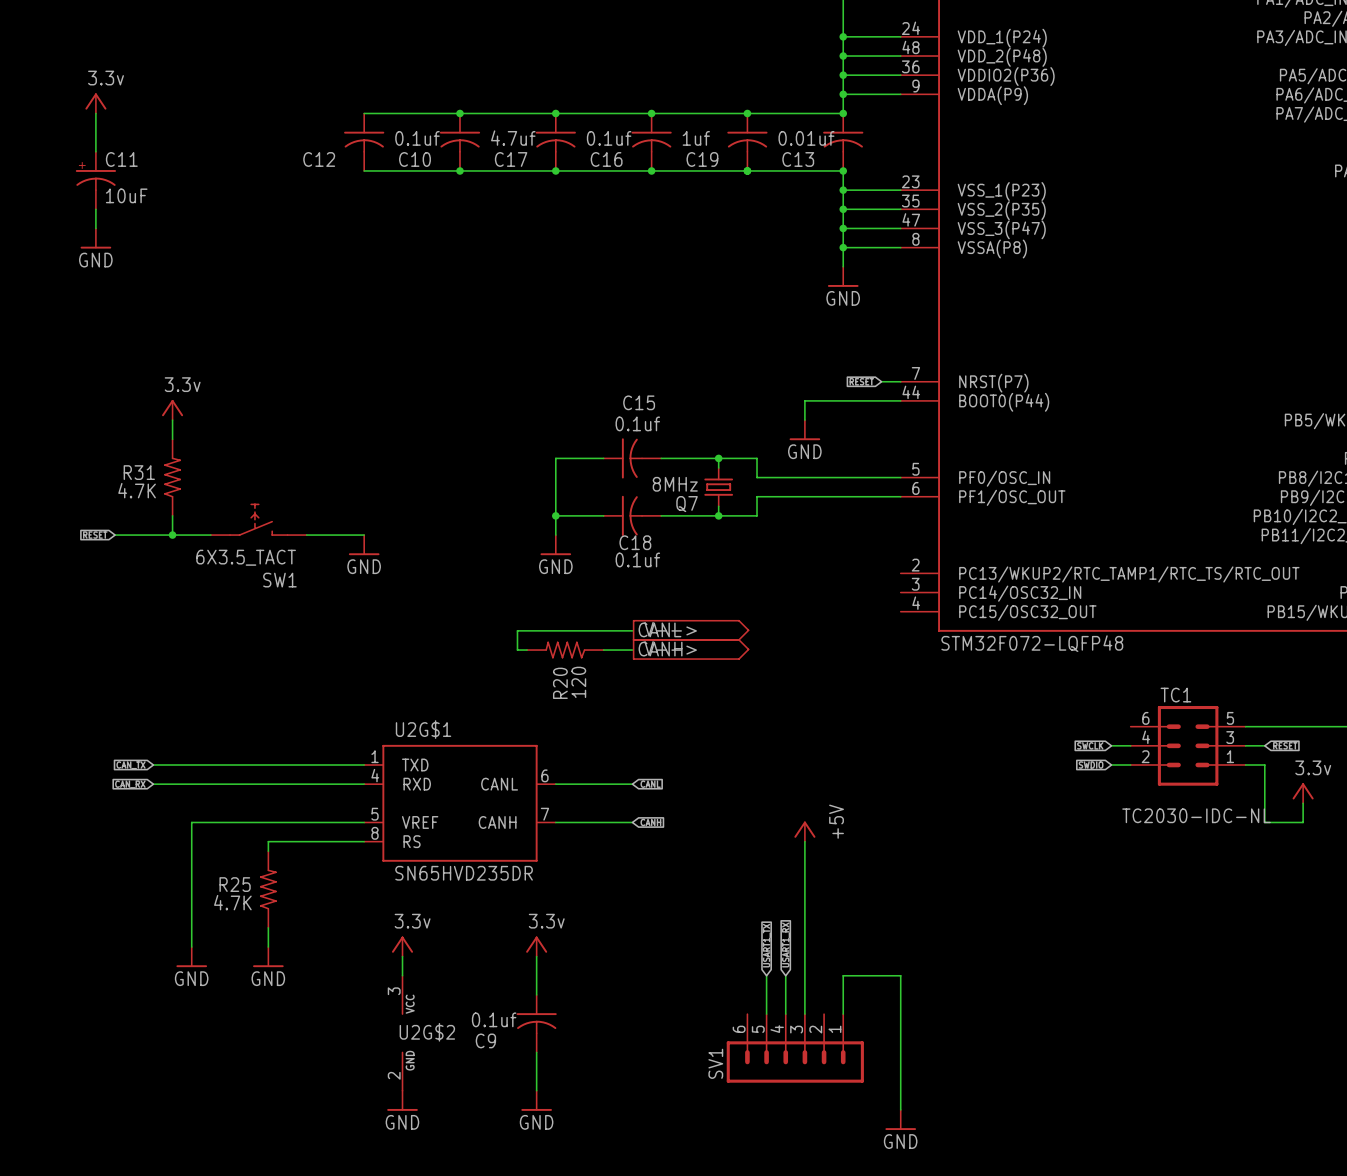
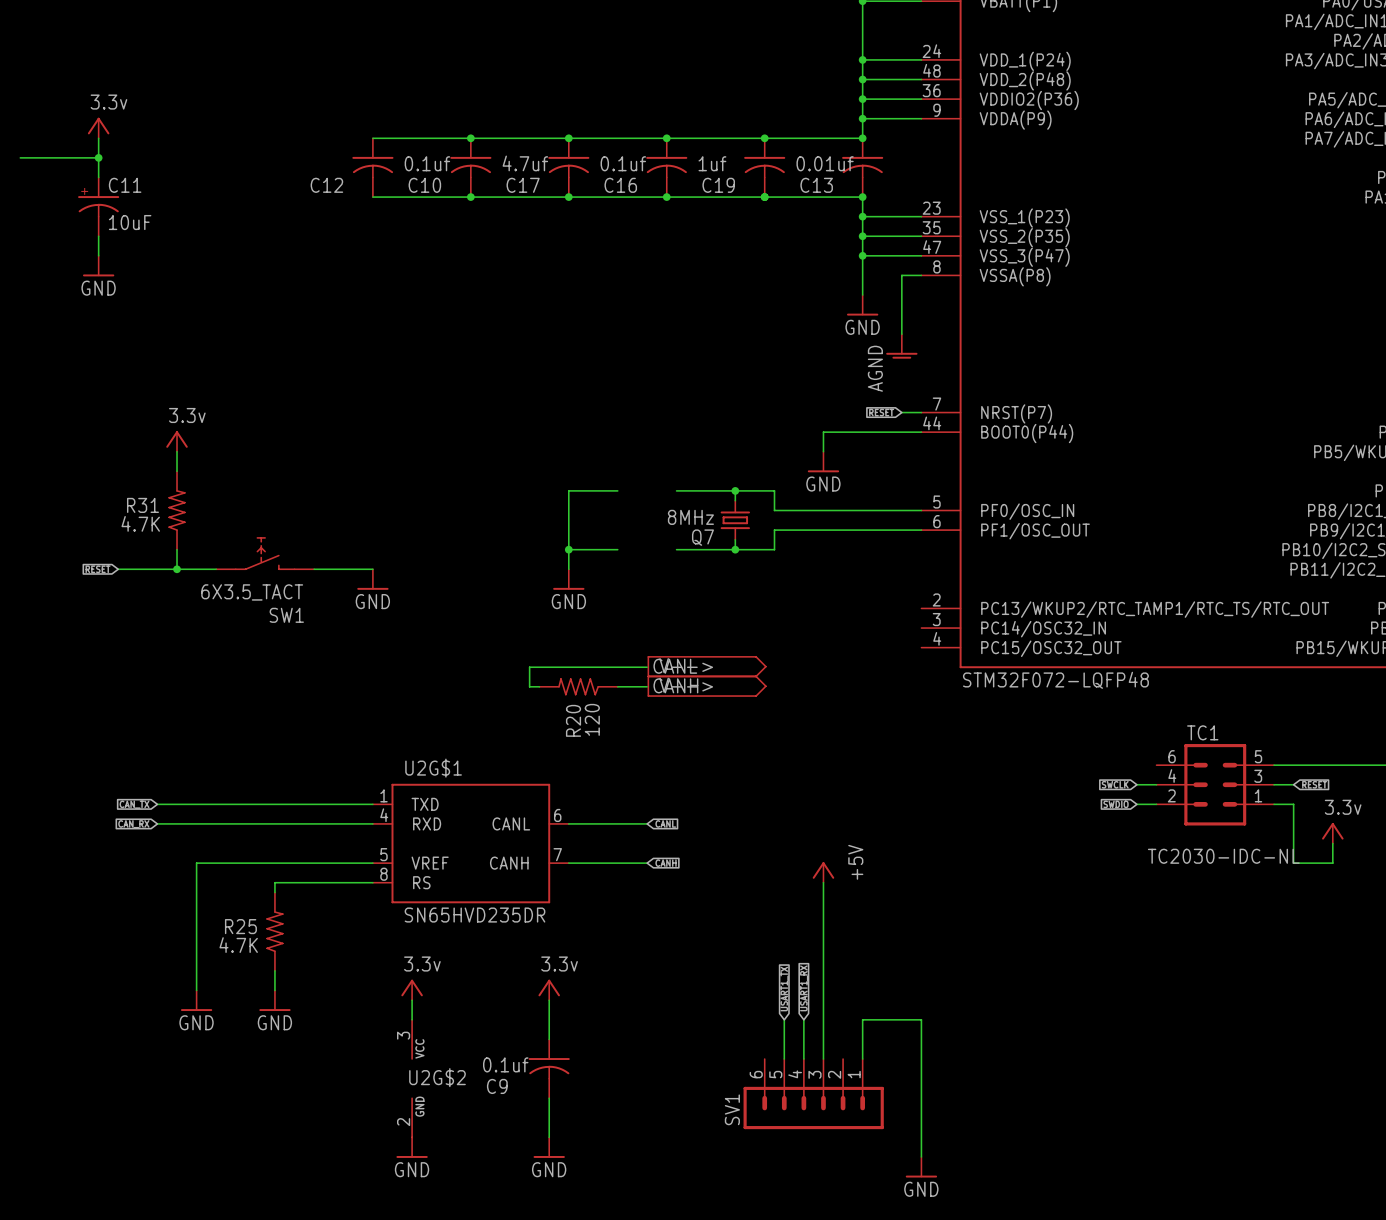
wire: none -> (20, 157) (98, 157)
junction: none -> (98, 157)
wire: (843, 247) (881, 247) -> (901, 334) (901, 275)
junction: (843, 247) -> none
power symbol: none -> AGND (901, 346)
C15: 0.1uf (632, 458) -> none
C18: 0.1uf (632, 515) -> none

